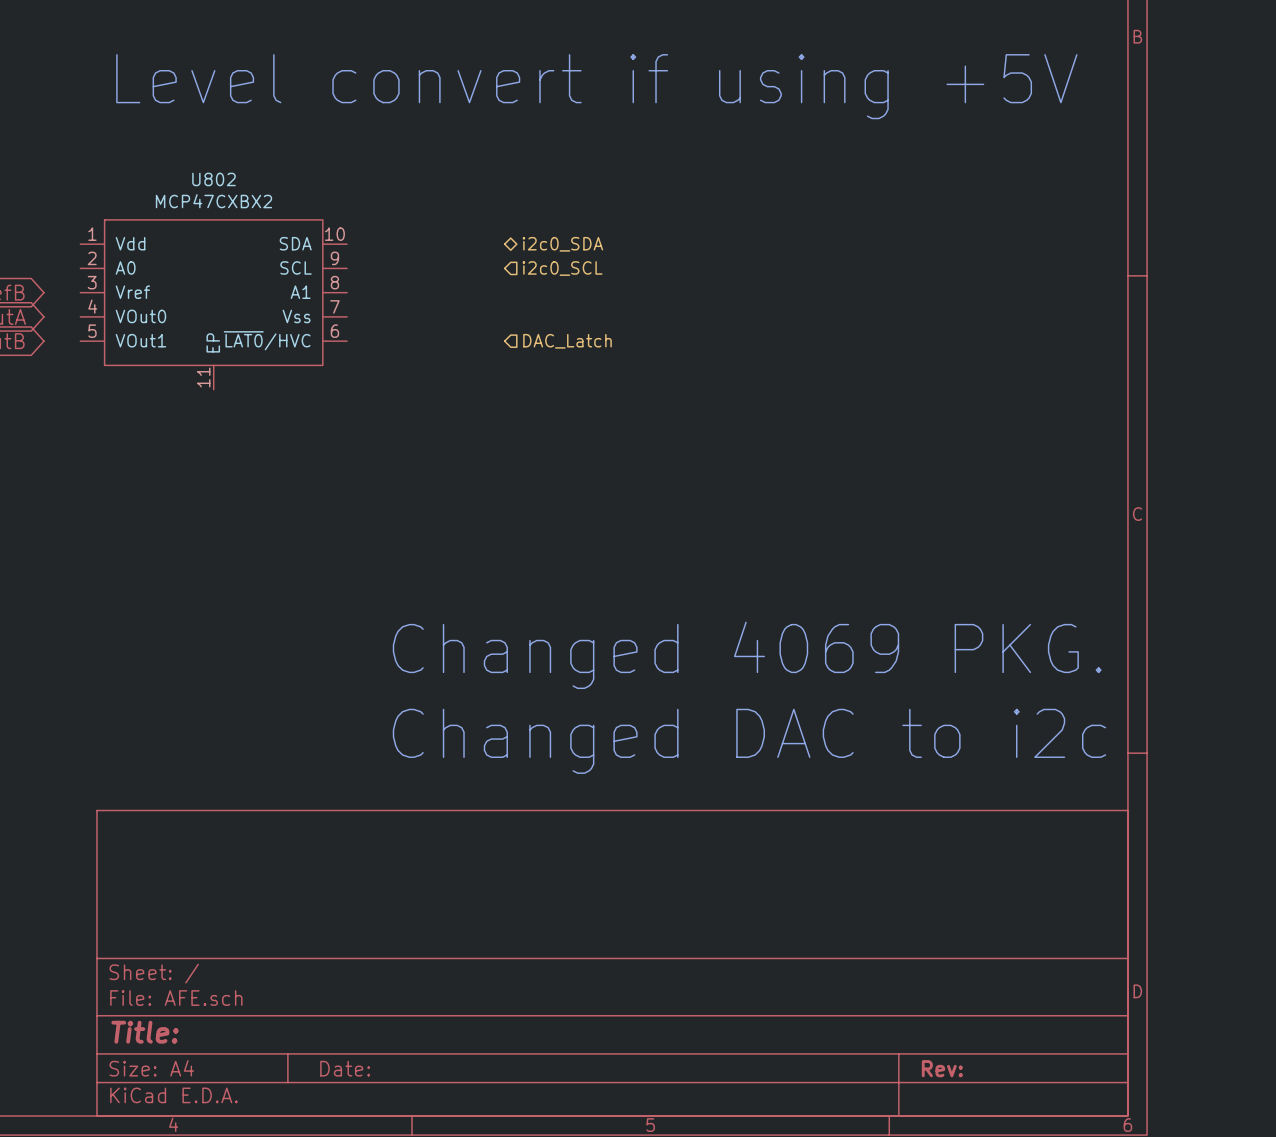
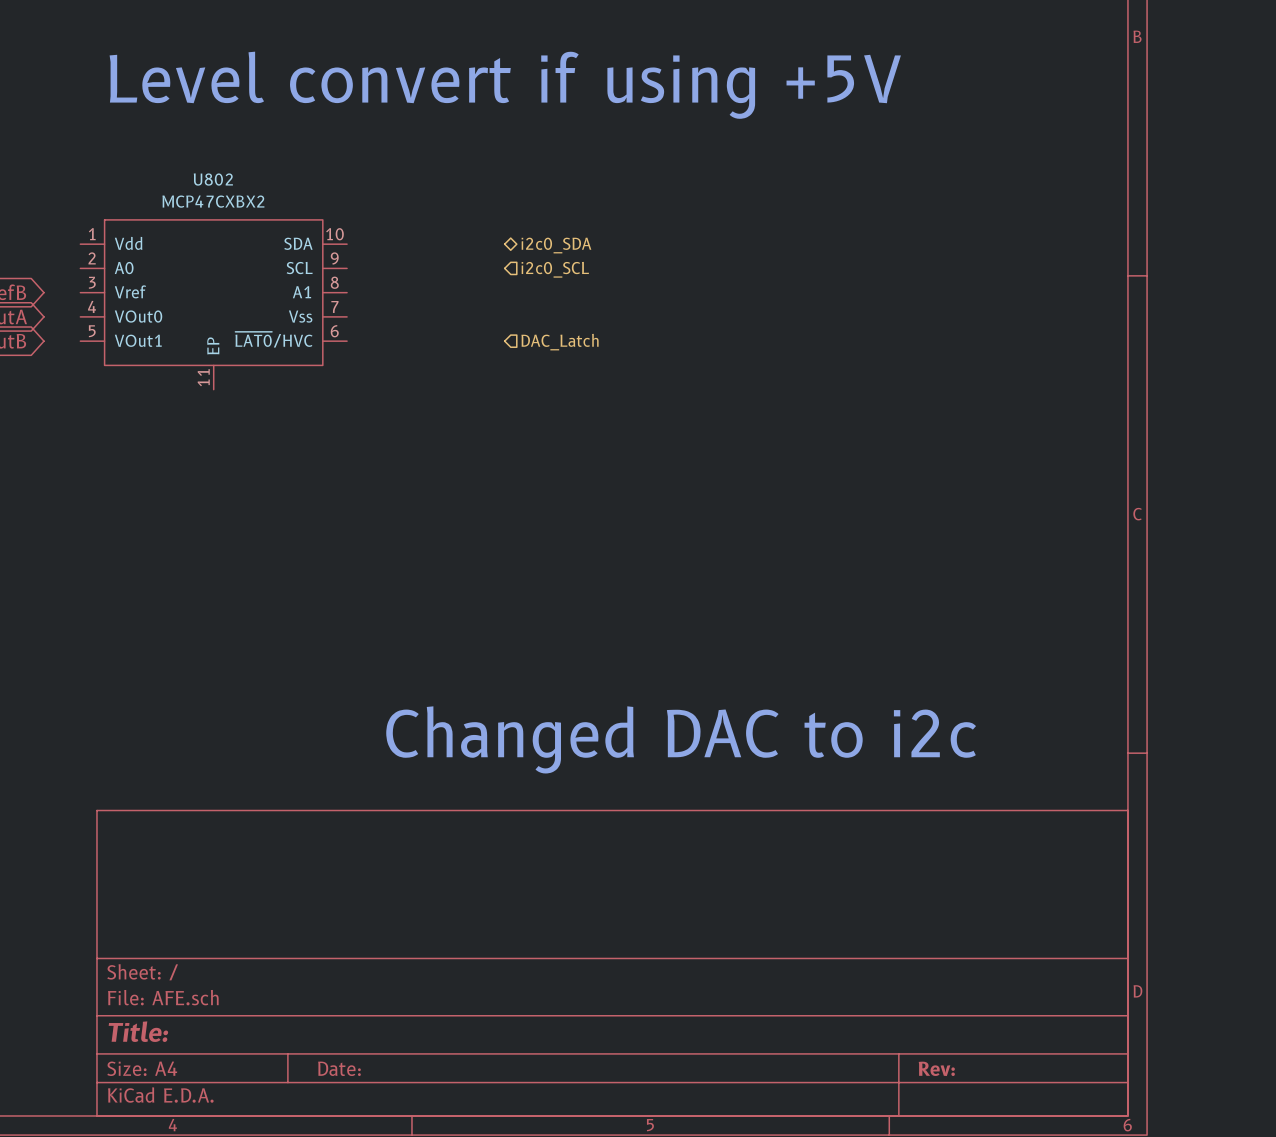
text: Changed 4069 PKG. (747, 655) -> none

